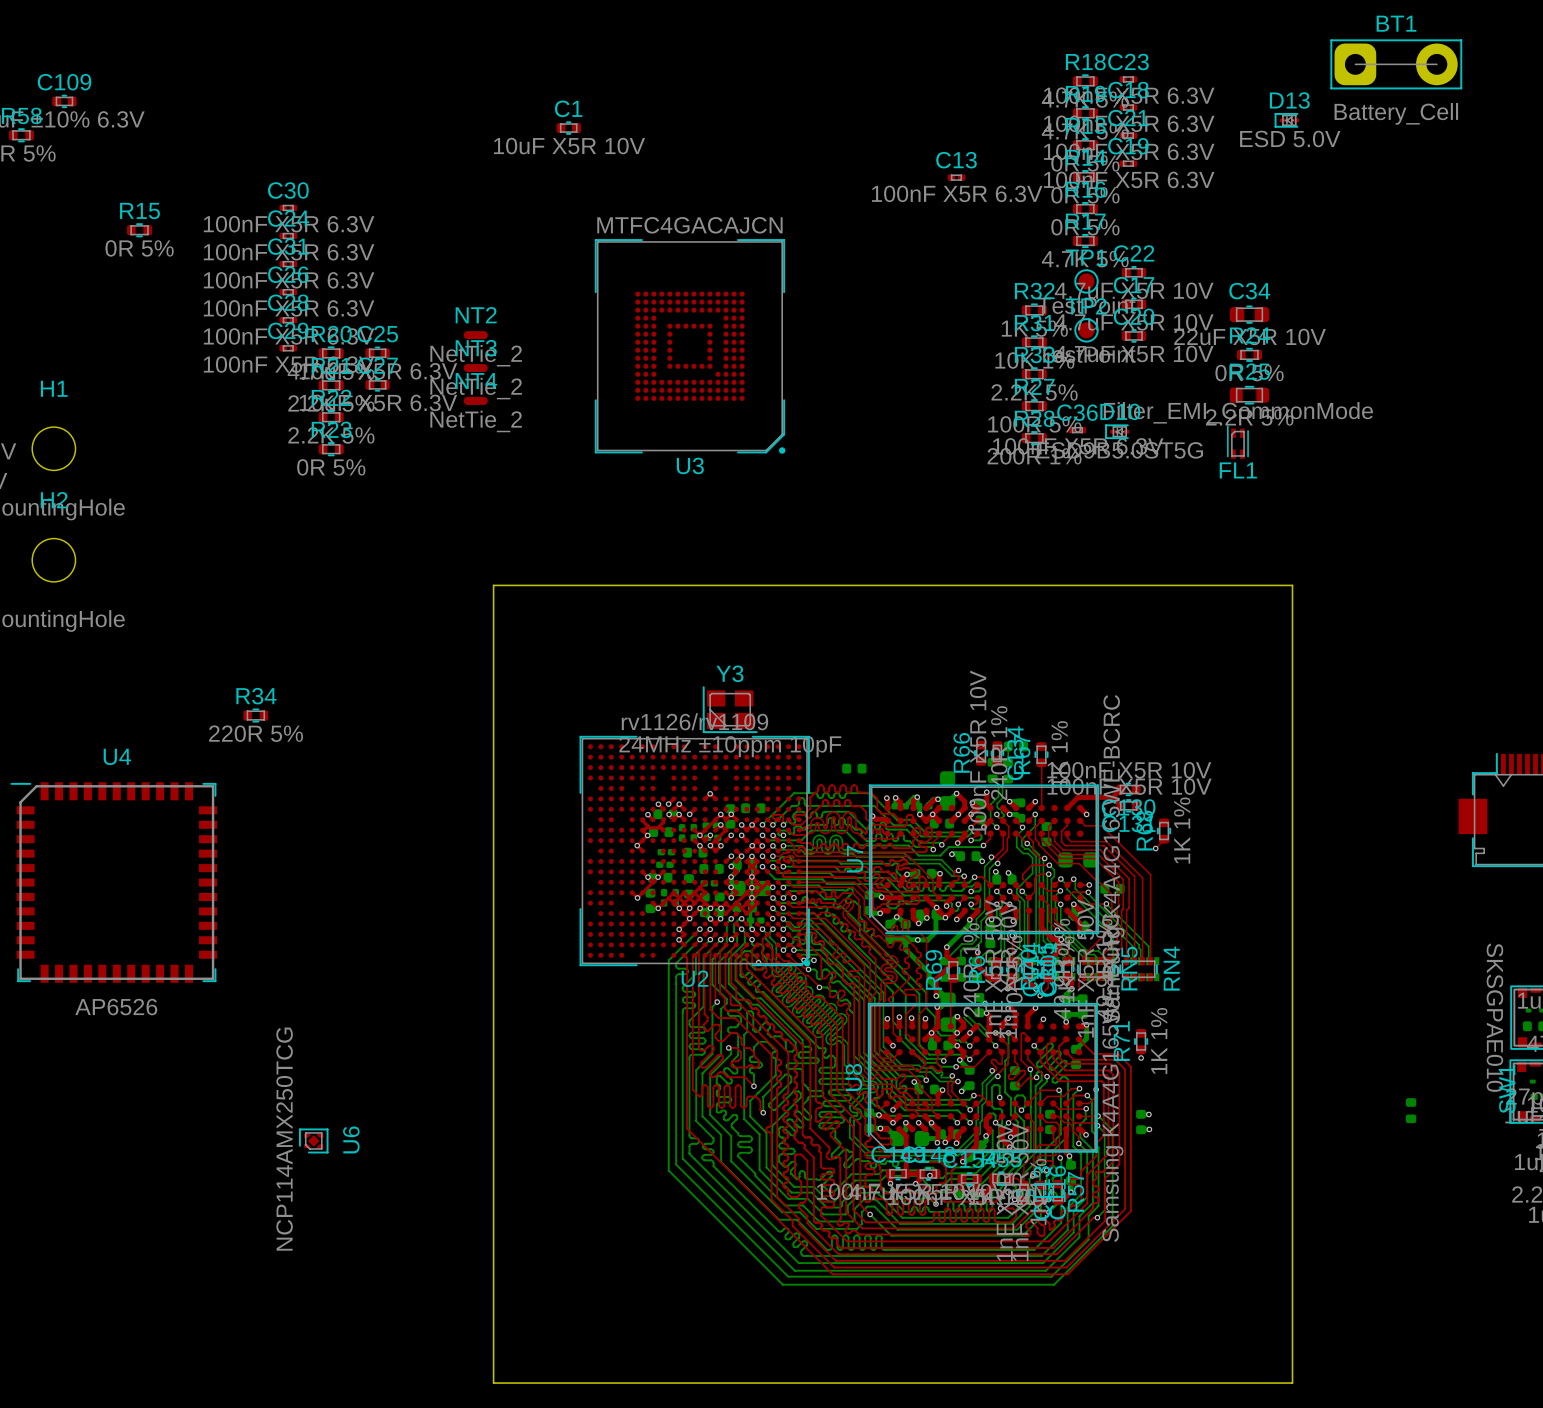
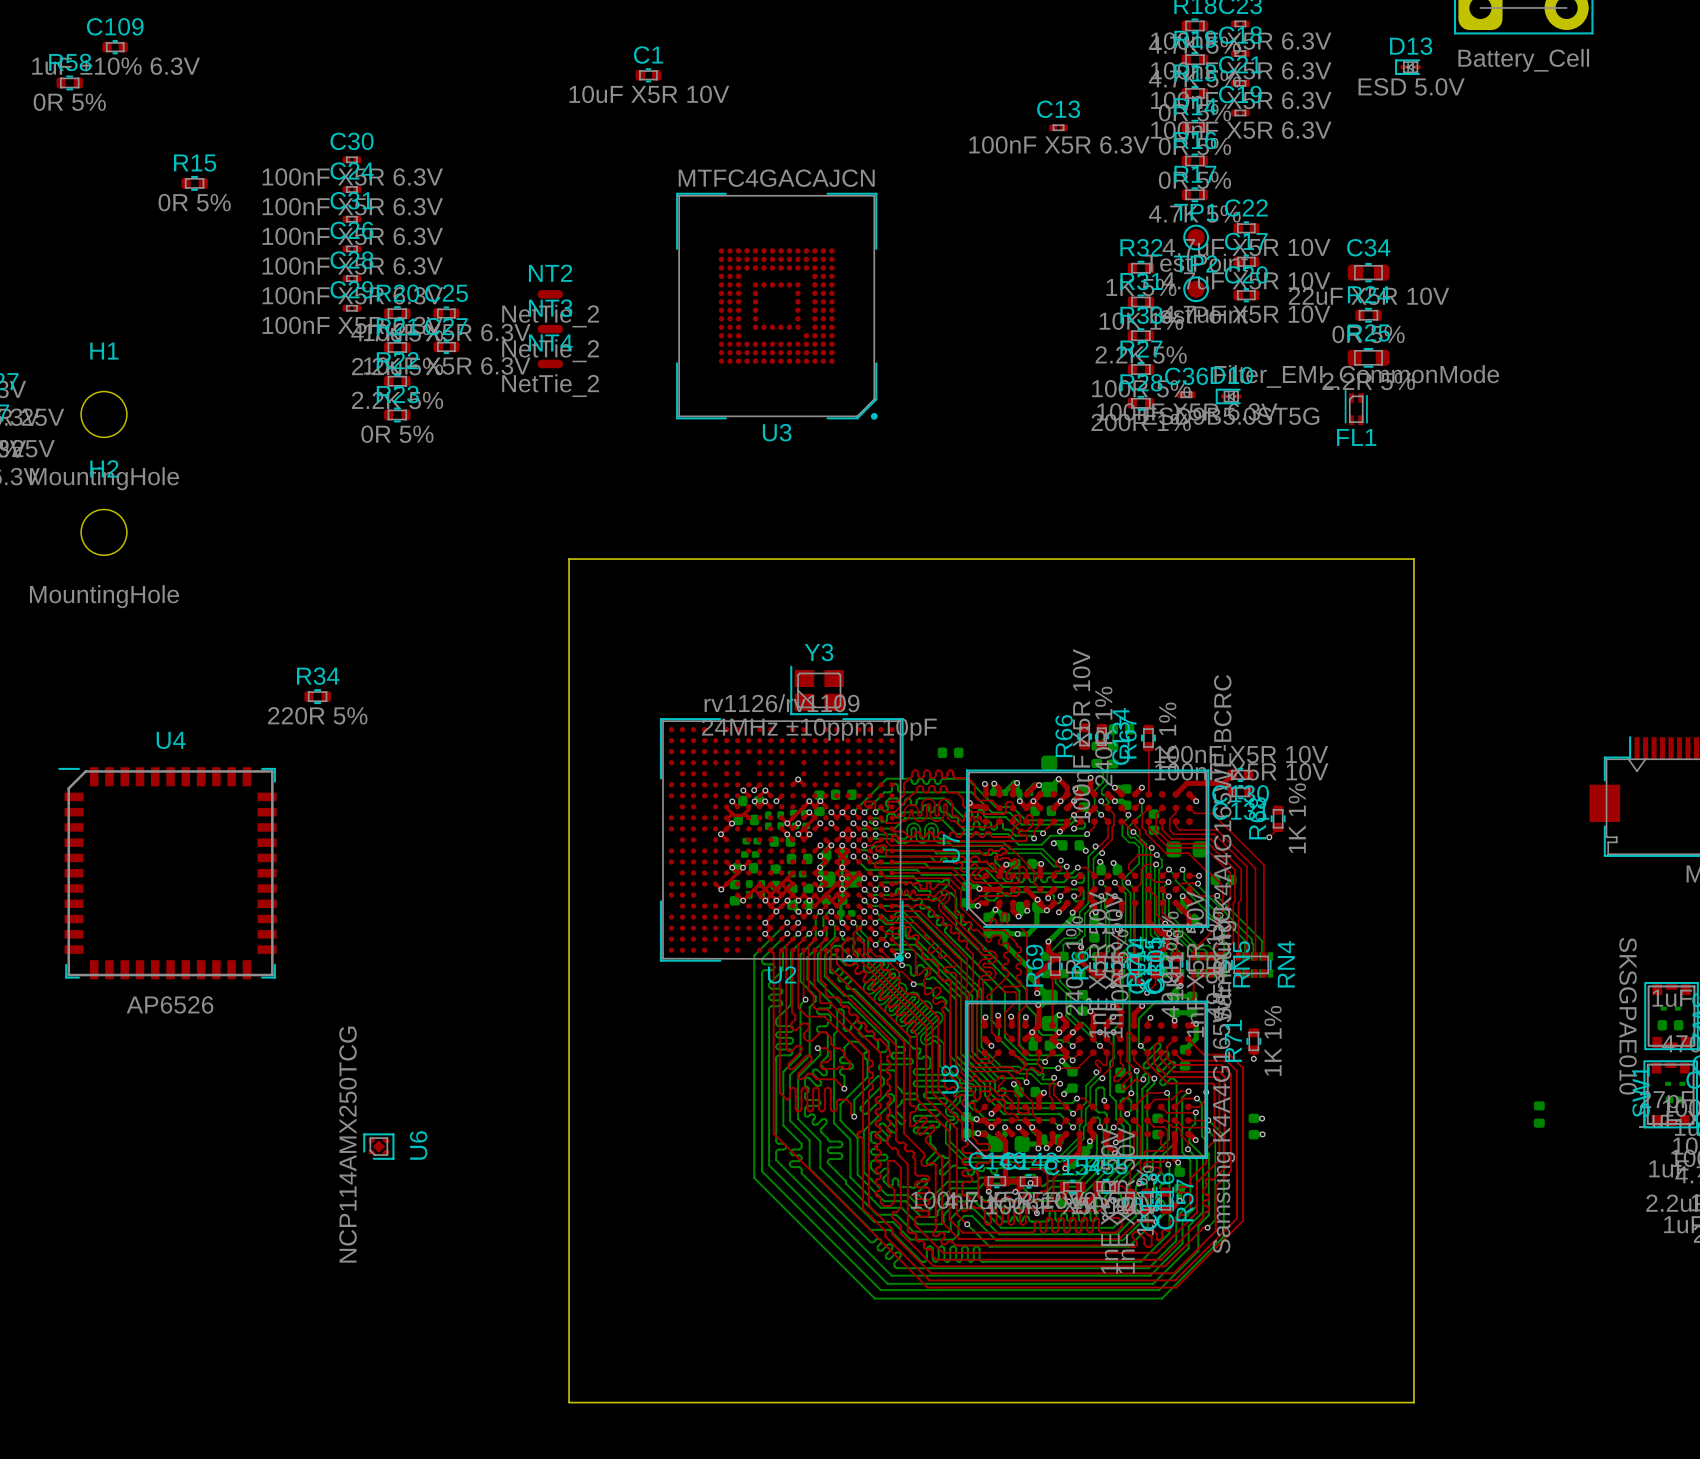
top track: (1067, 961) (1079, 972) (1079, 987) -> none
bottom track: none -> (1046, 973) (1049, 973) (1066, 993) (1066, 1015)
bottom track: none -> (1122, 973) (1122, 1020) (1113, 1029) (1113, 1032)
bottom track: none -> (1131, 973) (1129, 1074) (1131, 1075) (1131, 1093)
top track: none -> (1193, 973) (1193, 998) (1190, 1001) (1162, 1001)
bottom track: none -> (1059, 975) (1059, 980) (1070, 991) (1070, 1014)
bottom track: none -> (1162, 1001) (1155, 1001) (1138, 1018) (1138, 1043) (1140, 1045)
top track: none -> (1131, 1093) (1120, 1104) (1120, 1106)
via: none -> (1131, 1093)

